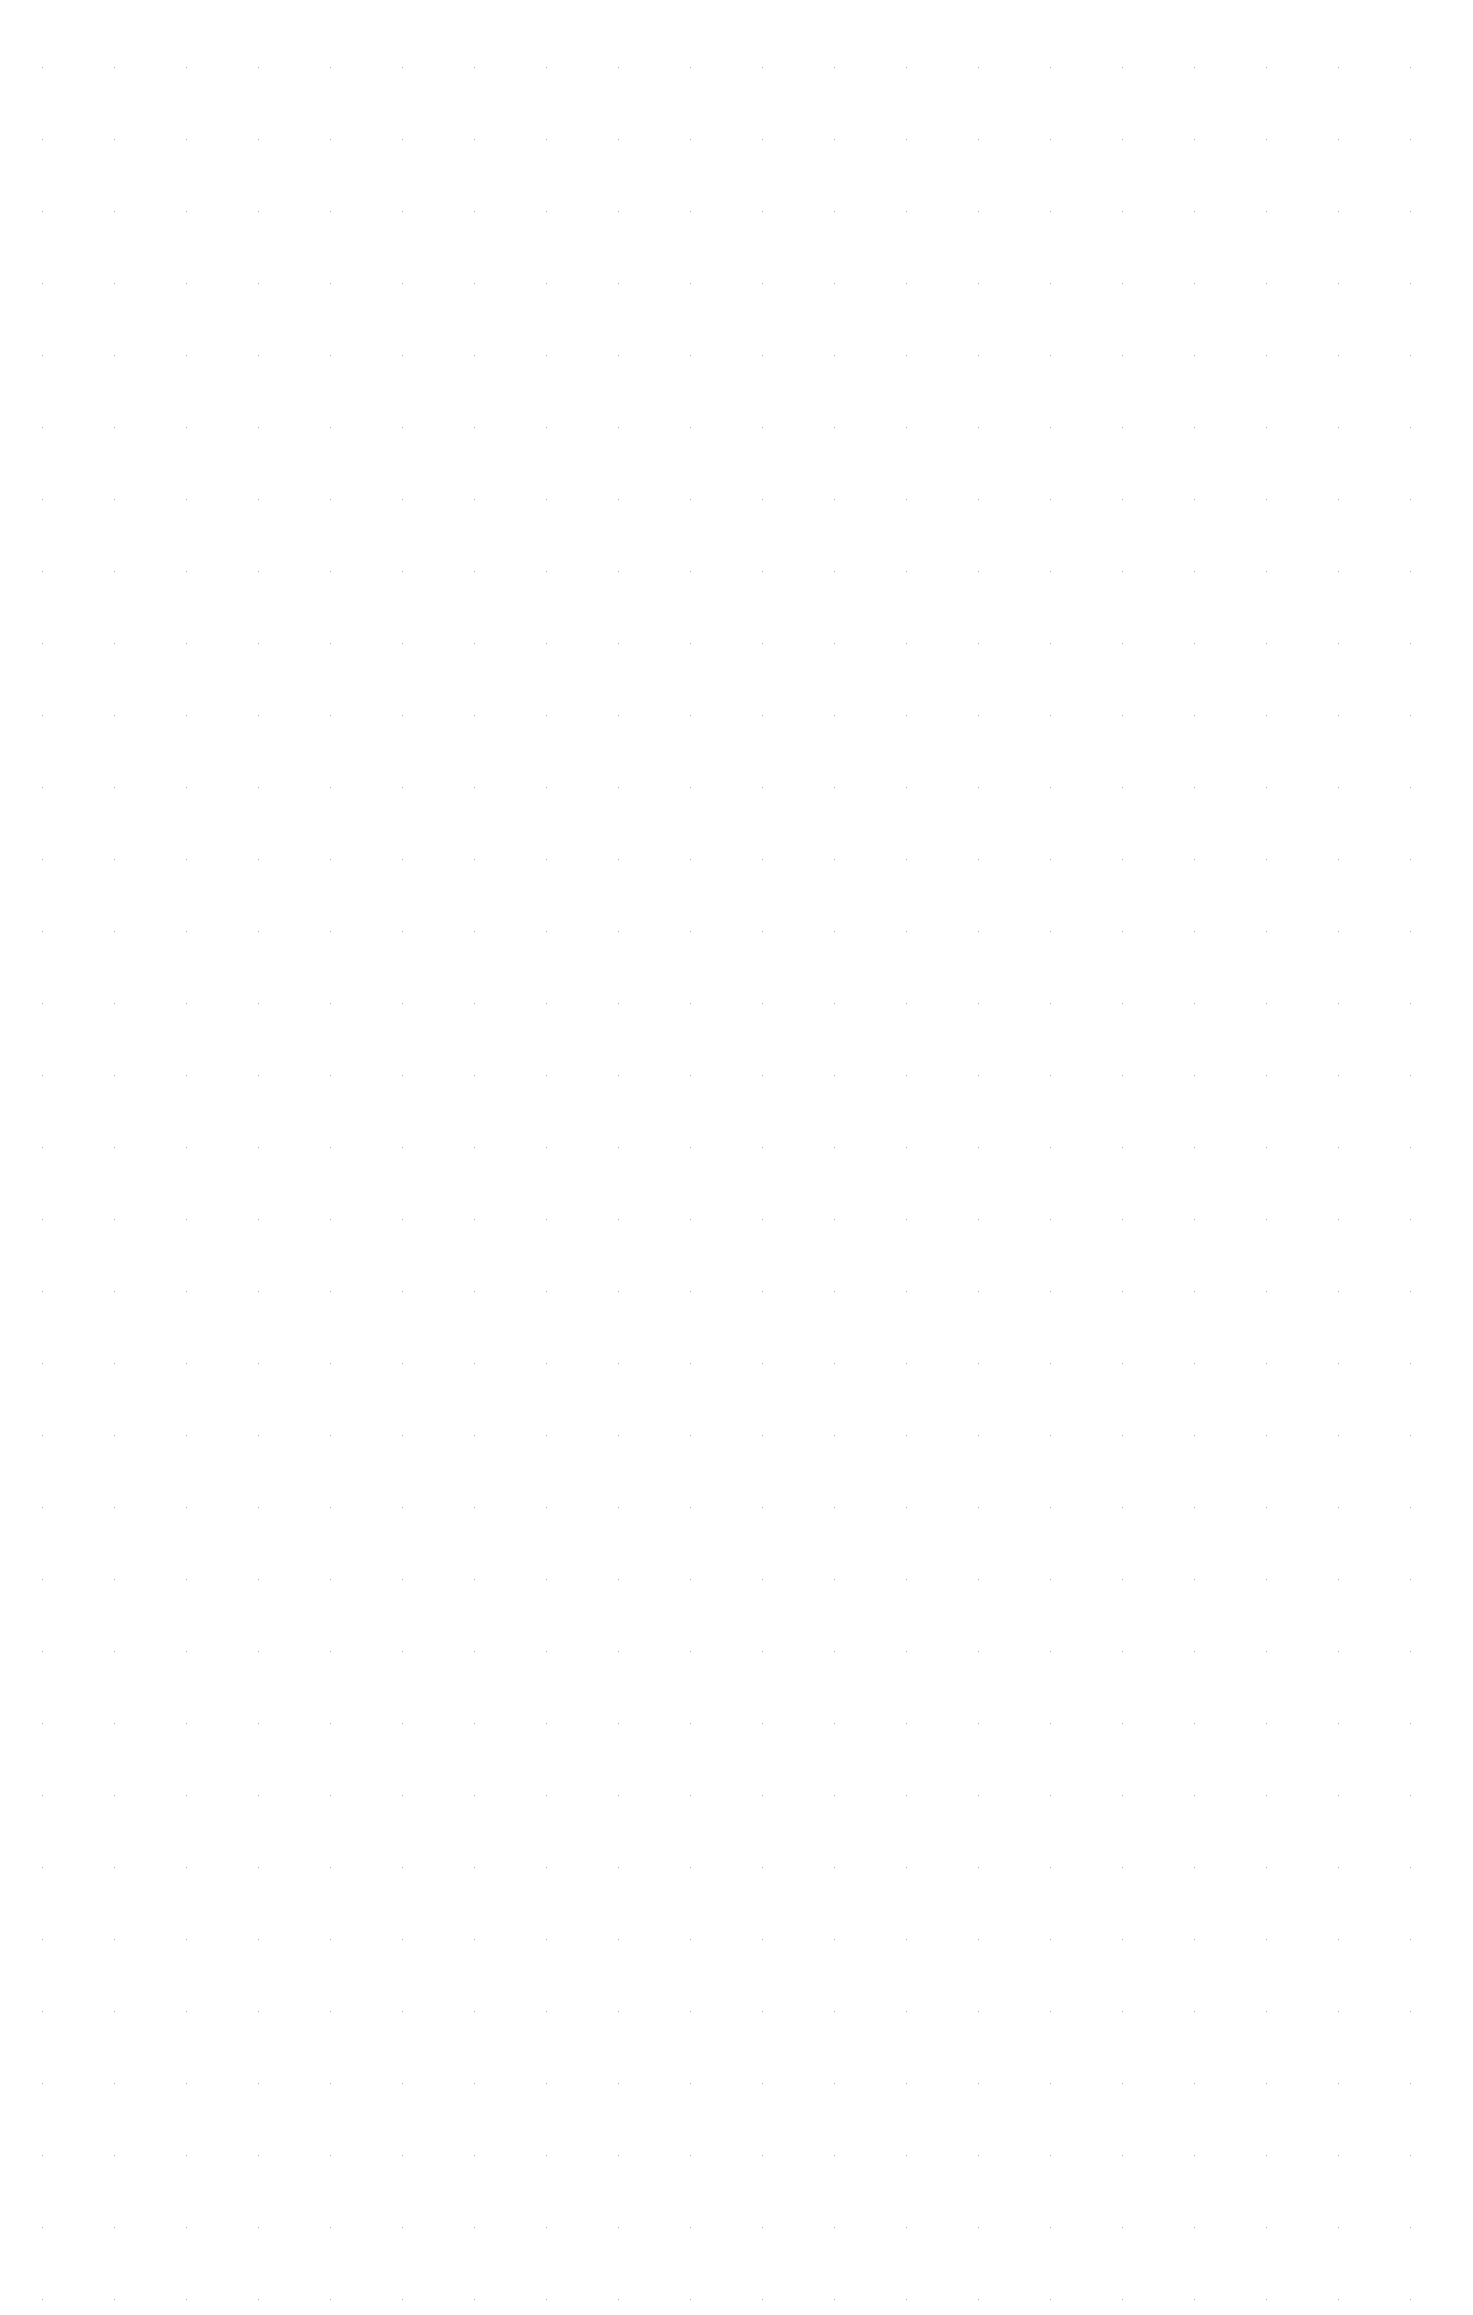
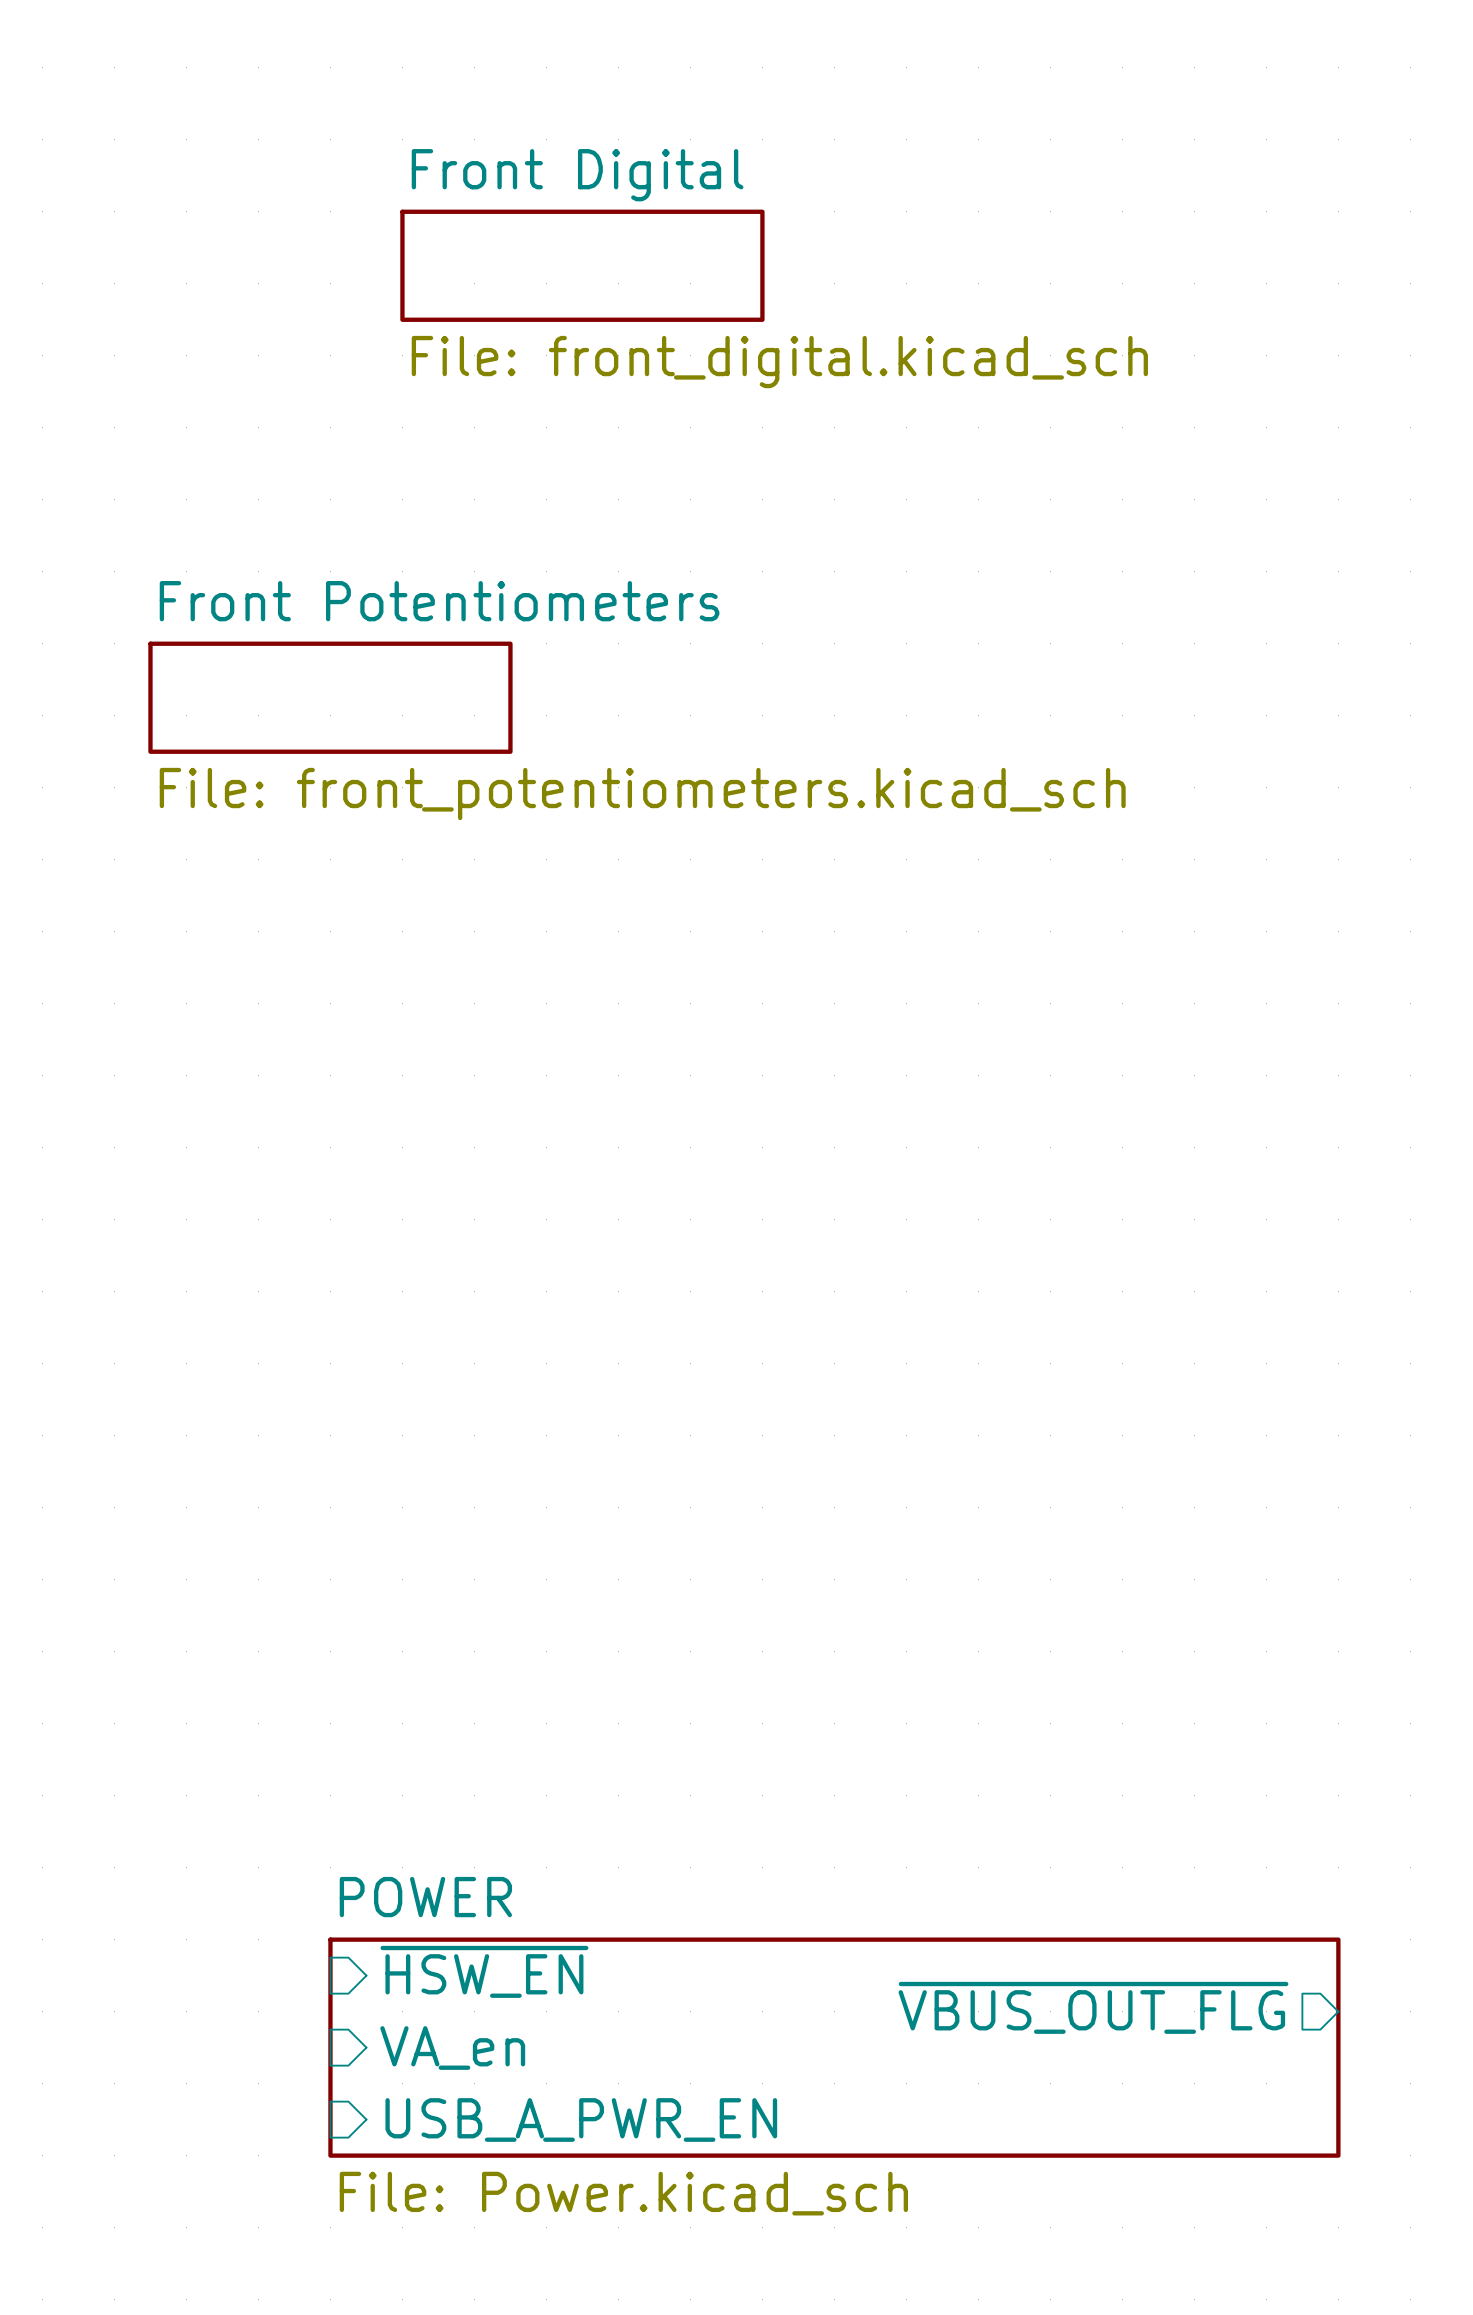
sheet Front Digital: none -> File: front_digital.kicad_sch (582, 265)
sheet Front Potentiometers: none -> File: front_potentiometers.kicad_sch (330, 697)
sheet pin: none -> ~{HSW_EN} (484, 1971)
sheet pin: none -> ~{VBUS_OUT_FLG} (1093, 2007)
sheet pin: none -> VA_en (452, 2047)
sheet POWER: none -> File: Power.kicad_sch (834, 2047)
sheet pin: none -> USB_A_PWR_EN (581, 2119)

